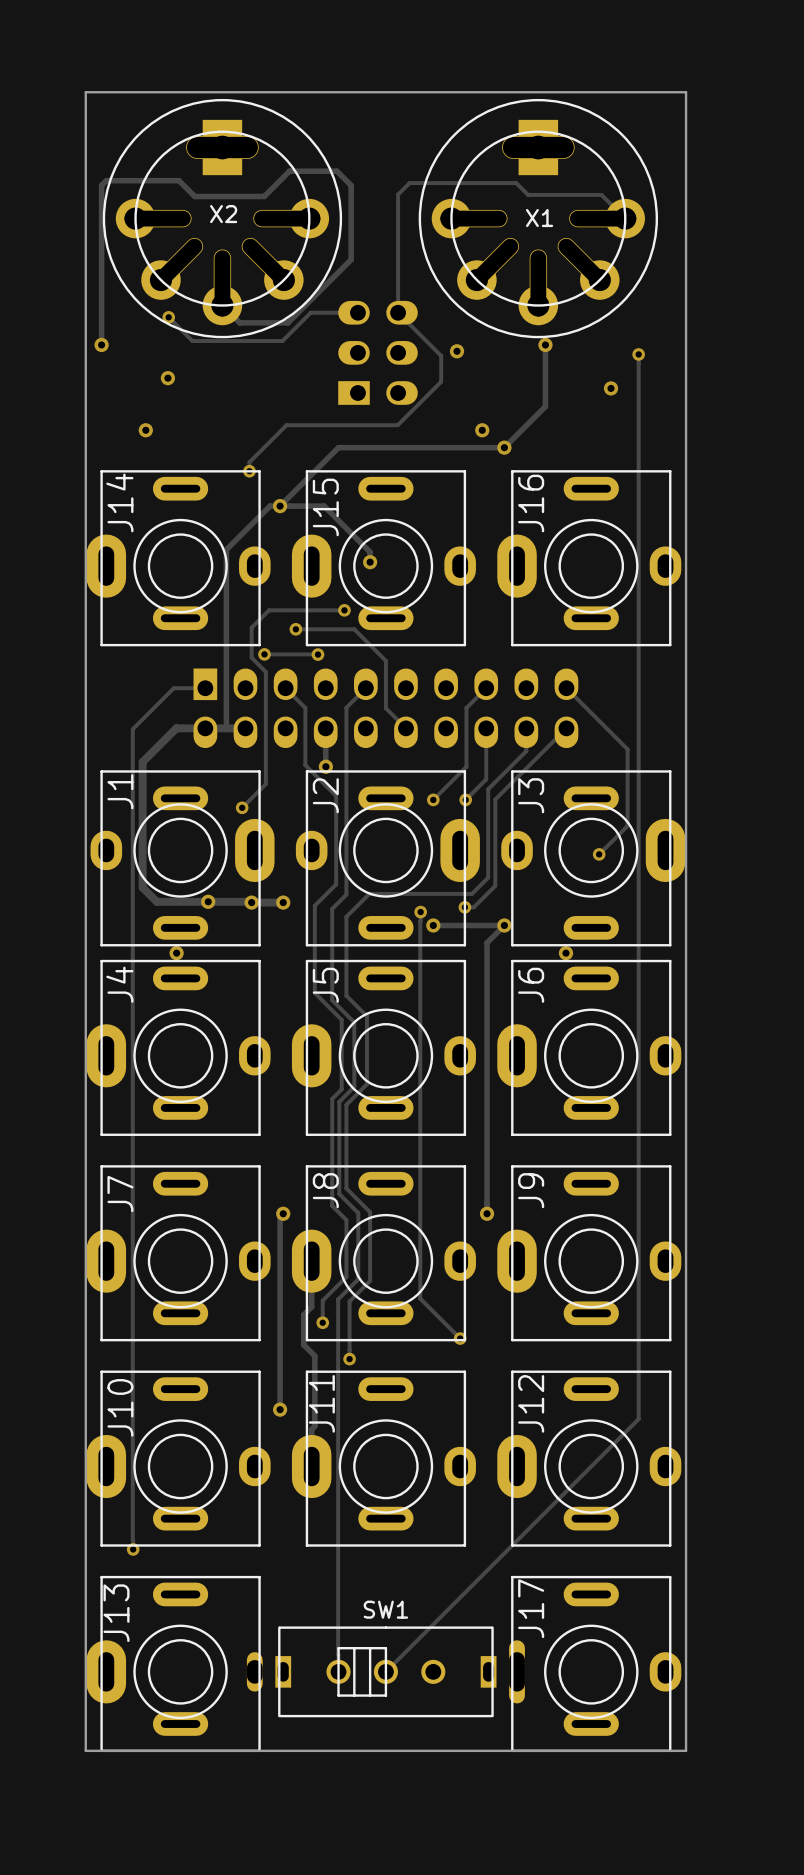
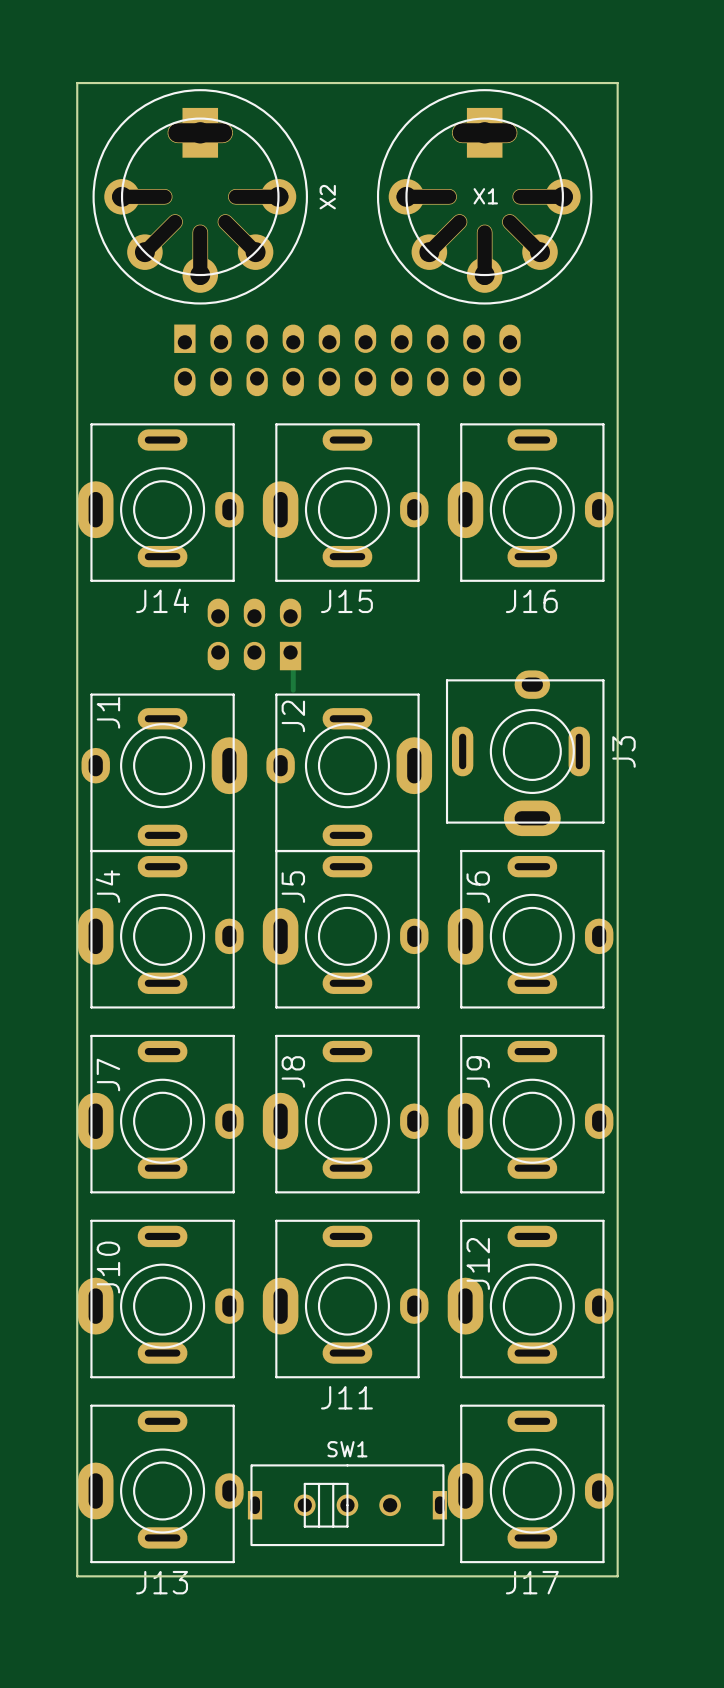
track: (611, 204) (601, 194) (528, 194) (516, 183) (409, 183) (398, 194) (398, 312) (441, 355) (441, 381) (397, 425) (286, 425) (249, 462) (249, 471) -> none
X2 name rotation: 0° (223, 214) -> 90° counterclockwise (327, 197)
X2 name position: X2 (223, 214) -> X2 (327, 197)
track: (357, 312) (310, 312) (282, 341) (192, 341) (168, 317) -> none
via: (168, 317) -> none
track: (234, 317) (239, 322) (287, 322) (351, 259) (351, 185) (336, 171) (289, 171) (264, 196) (194, 196) (178, 180) (106, 180) (101, 185) (101, 344) -> none
via: (101, 344) -> none
track: (545, 344) (545, 406) (504, 447) (338, 447) (280, 506) -> none
via: (545, 344) -> none
via: (457, 351) -> none
part rotation: 0° (378, 352) -> 90° counterclockwise (254, 634)
part position: (378, 352) -> (254, 634)
track: (638, 354) (638, 1419) (385, 1671) -> none
via: (638, 354) -> none
via: (167, 378) -> none
via: (611, 388) -> none
via: (145, 430) -> none
via: (482, 430) -> none
via: (504, 447) -> none
via: (249, 471) -> none
J14 name rotation: 0° (119, 502) -> 90° clockwise (162, 600)
J14 name position: J14 (119, 502) -> J14 (162, 600)
J16 name rotation: 0° (531, 503) -> 90° clockwise (531, 601)
J16 name position: J16 (531, 503) -> J16 (531, 601)
via: (280, 506) -> none
J15 name rotation: 0° (325, 507) -> 90° clockwise (346, 601)
J15 name position: J15 (325, 507) -> J15 (346, 601)
track: (370, 562) (370, 552) (324, 506) (270, 506) (226, 549) (226, 728) -> none
via: (370, 562) -> none
track: (344, 610) (269, 610) (251, 627) (251, 657) (265, 671) (265, 784) (242, 807) -> none
via: (344, 610) -> none
track: (295, 629) (354, 629) (385, 660) (385, 708) (405, 728) -> none
via: (295, 629) -> none
track: (264, 654) (317, 654) -> none
via: (264, 654) -> none
via: (317, 654) -> none
track: (205, 688) (173, 688) (132, 729) (133, 1549) -> none
track: (285, 688) (305, 707) (305, 765) (336, 795) (336, 884) (314, 905) (314, 992) (341, 1019) (341, 1089) (332, 1098) (332, 1205) (346, 1220) (346, 1276) (322, 1300) (322, 1322) -> none
track: (365, 688) (346, 707) (346, 894) (332, 908) (332, 1000) (354, 1022) (354, 1086) (339, 1101) (339, 1194) (358, 1212) (358, 1279) (338, 1299) (338, 1671) -> none
track: (486, 688) (466, 707) (466, 766) (433, 799) -> none
track: (566, 688) (627, 749) (627, 825) (599, 854) -> none
part position: (385, 708) -> (347, 360)
track: (245, 728) (176, 728) (142, 762) (142, 887) (156, 901) (283, 902) -> none
track: (486, 728) (486, 779) (465, 799) -> none
track: (526, 728) (526, 751) (488, 789) (488, 877) (472, 893) (369, 893) (346, 916) (346, 995) (366, 1016) (366, 1084) (346, 1104) (346, 1188) (370, 1212) (370, 1280) (349, 1301) (349, 1359) -> none
track: (566, 728) (495, 799) (495, 885) (473, 907) (464, 907) -> none
via: (325, 766) -> none
J3 name position: J3 (531, 795) -> J3 (623, 751)
via: (433, 799) -> none
via: (465, 799) -> none
via: (242, 807) -> none
via: (599, 854) -> none
J3 rotation: 0° (593, 858) -> 90° clockwise (525, 753)
via: (208, 901) -> none
via: (251, 902) -> none
via: (283, 902) -> none
via: (464, 907) -> none
track: (420, 912) (420, 1298) (460, 1338) -> none
via: (420, 912) -> none
track: (433, 925) (504, 925) (487, 942) (487, 1213) -> none
via: (433, 925) -> none
via: (504, 925) -> none
via: (176, 953) -> none
via: (566, 953) -> none
J4 position: (178, 1047) -> (160, 929)
J5 position: (383, 1047) -> (345, 929)
J6 position: (589, 1047) -> (530, 929)
track: (283, 1213) (280, 1216) (280, 1409) -> none
via: (283, 1213) -> none
via: (487, 1213) -> none
J7 position: (178, 1253) -> (160, 1114)
J8 position: (383, 1253) -> (345, 1114)
J9 position: (589, 1253) -> (530, 1114)
track: (311, 1261) (311, 1306) (303, 1314) (303, 1344) (314, 1355) (314, 1426) (311, 1429) (311, 1466) -> none
via: (322, 1322) -> none
via: (460, 1338) -> none
via: (349, 1359) -> none
J11 name rotation: 0° (321, 1403) -> 90° clockwise (346, 1397)
J11 name position: J11 (321, 1403) -> J11 (346, 1397)
via: (280, 1409) -> none
J10 position: (178, 1458) -> (160, 1299)
J11 position: (383, 1458) -> (345, 1299)
J12 position: (589, 1458) -> (530, 1299)
via: (133, 1549) -> none
J13 footprint: [86, 1575, 263, 1753] -> [77, 1404, 244, 1564]
J17 footprint: [509, 1575, 682, 1753] -> [447, 1404, 614, 1564]
J17 name position: J17 (531, 1608) -> J17 (532, 1582)
J13 name position: J13 (116, 1613) -> J13 (162, 1582)

